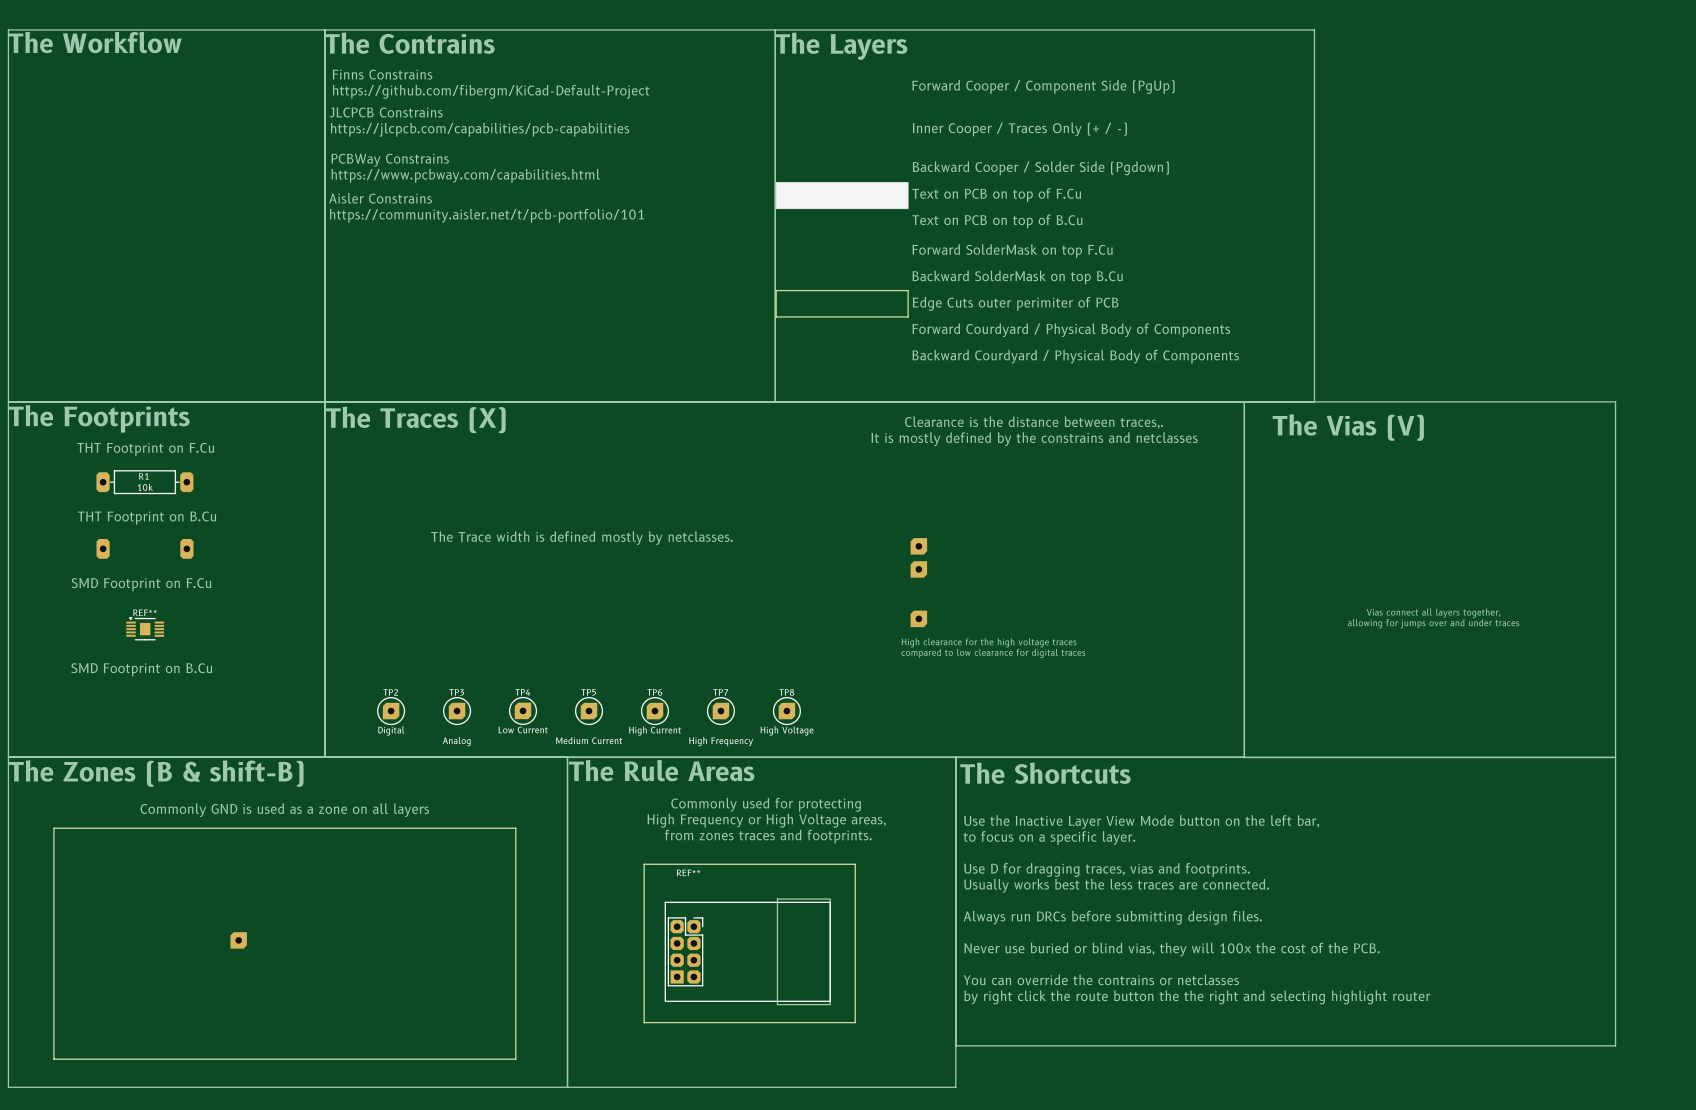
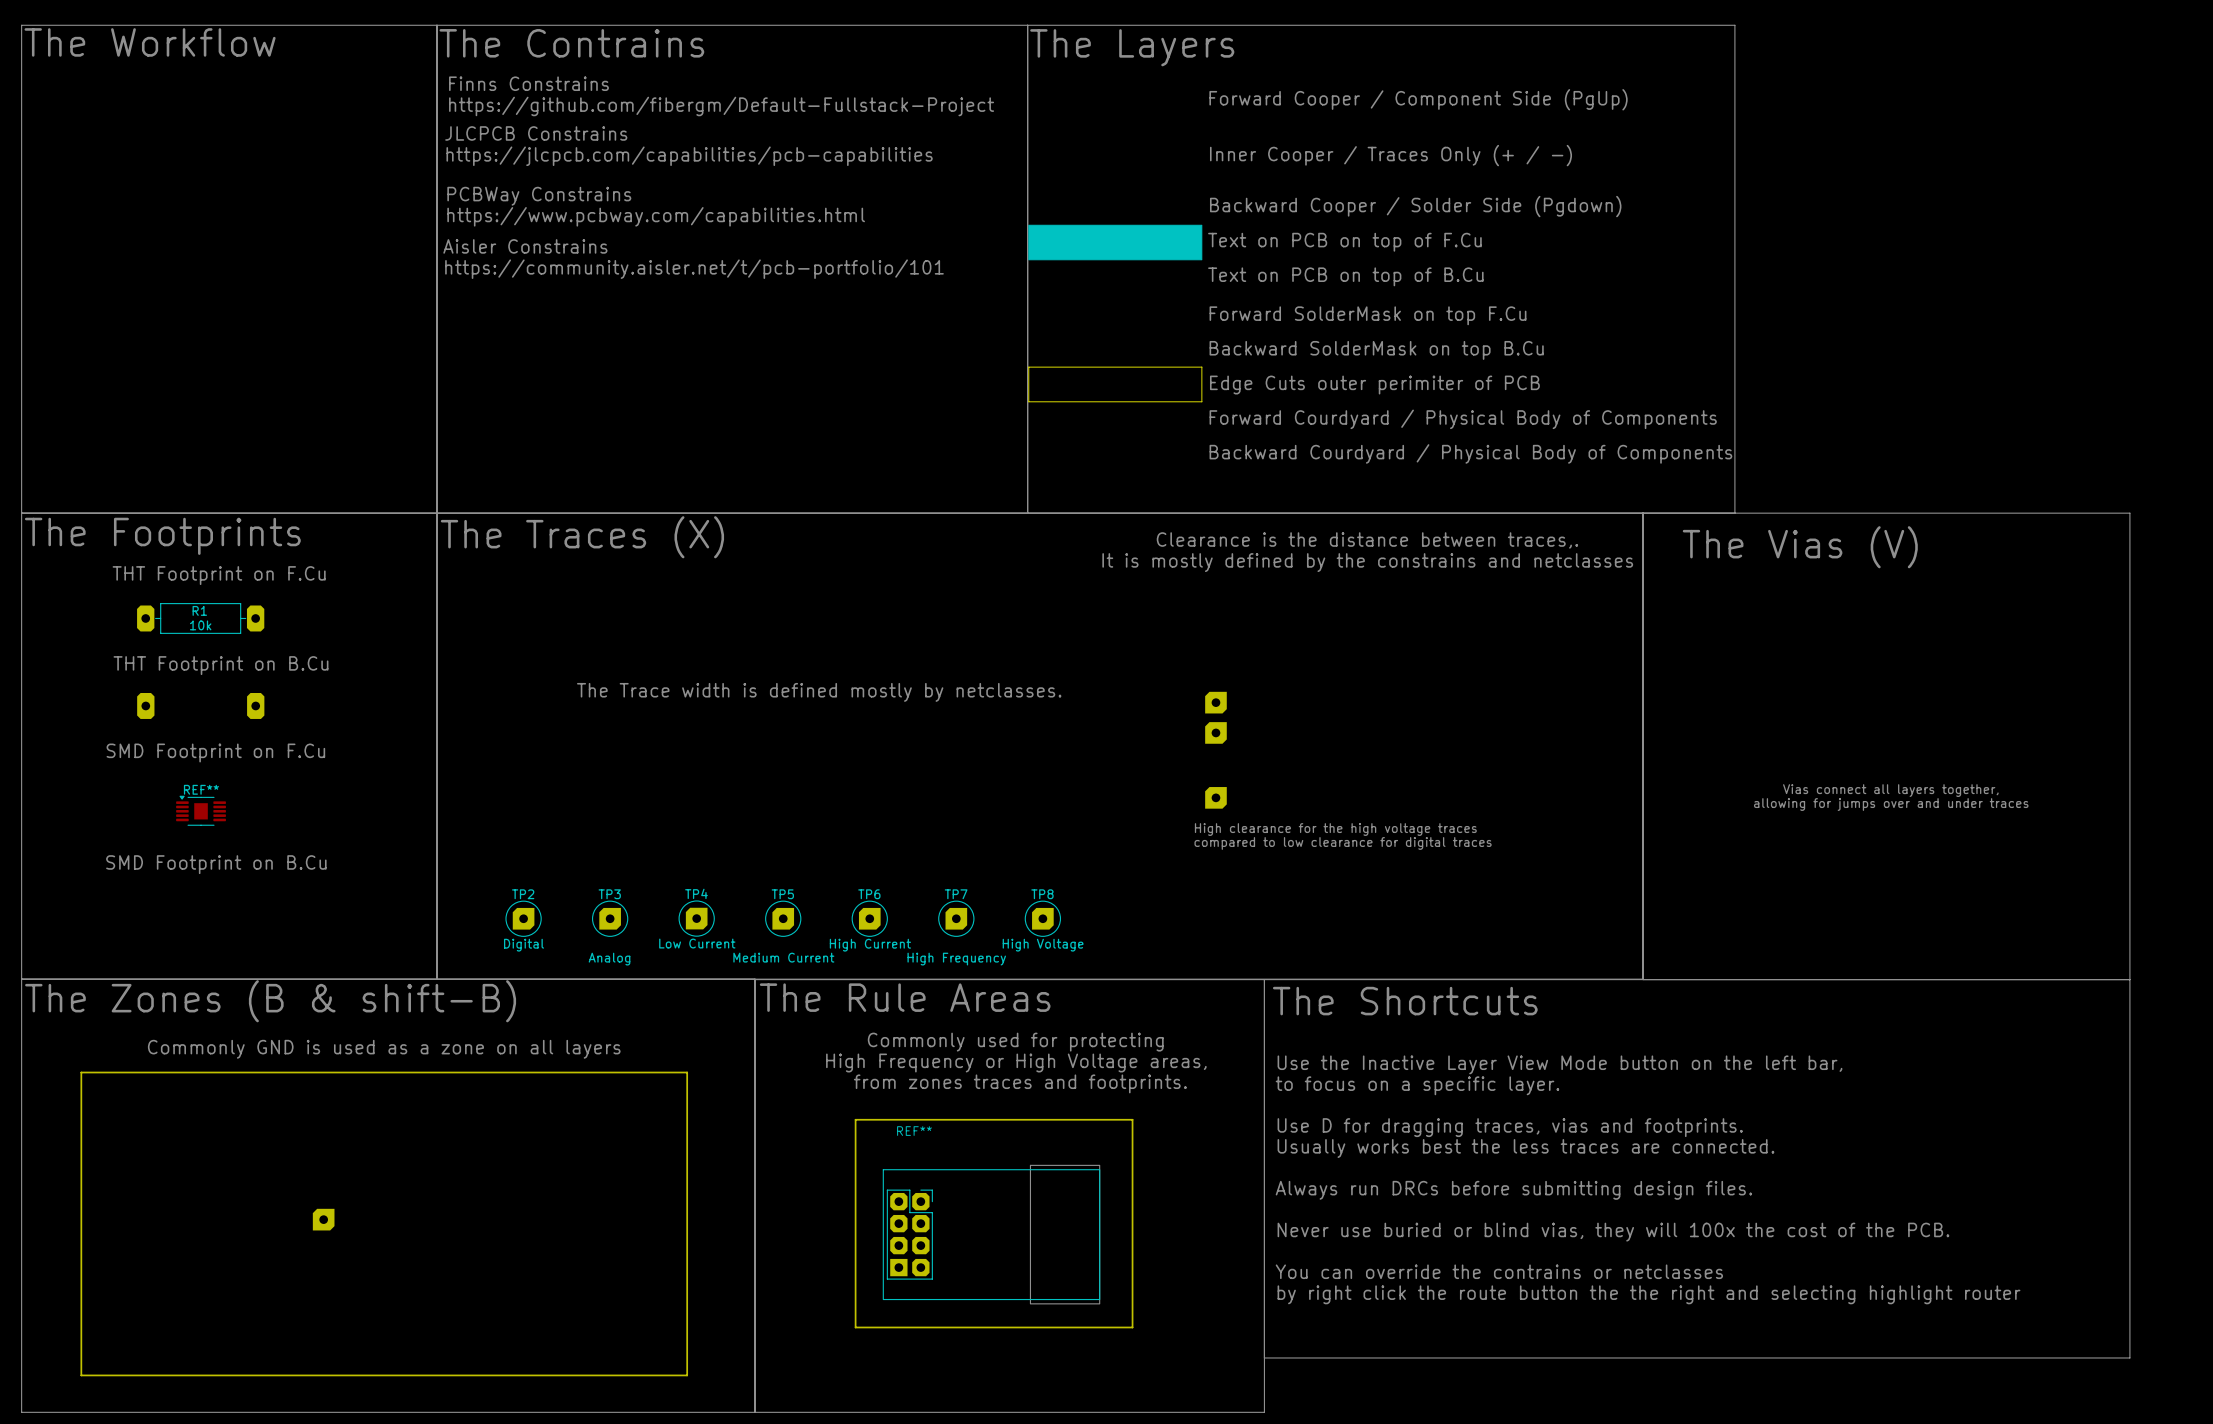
text: https://github.com/fibergm/KiCad-Default-Project (491, 91) -> https://github.com/fibergm/Default-Fullstack-Project (721, 106)

